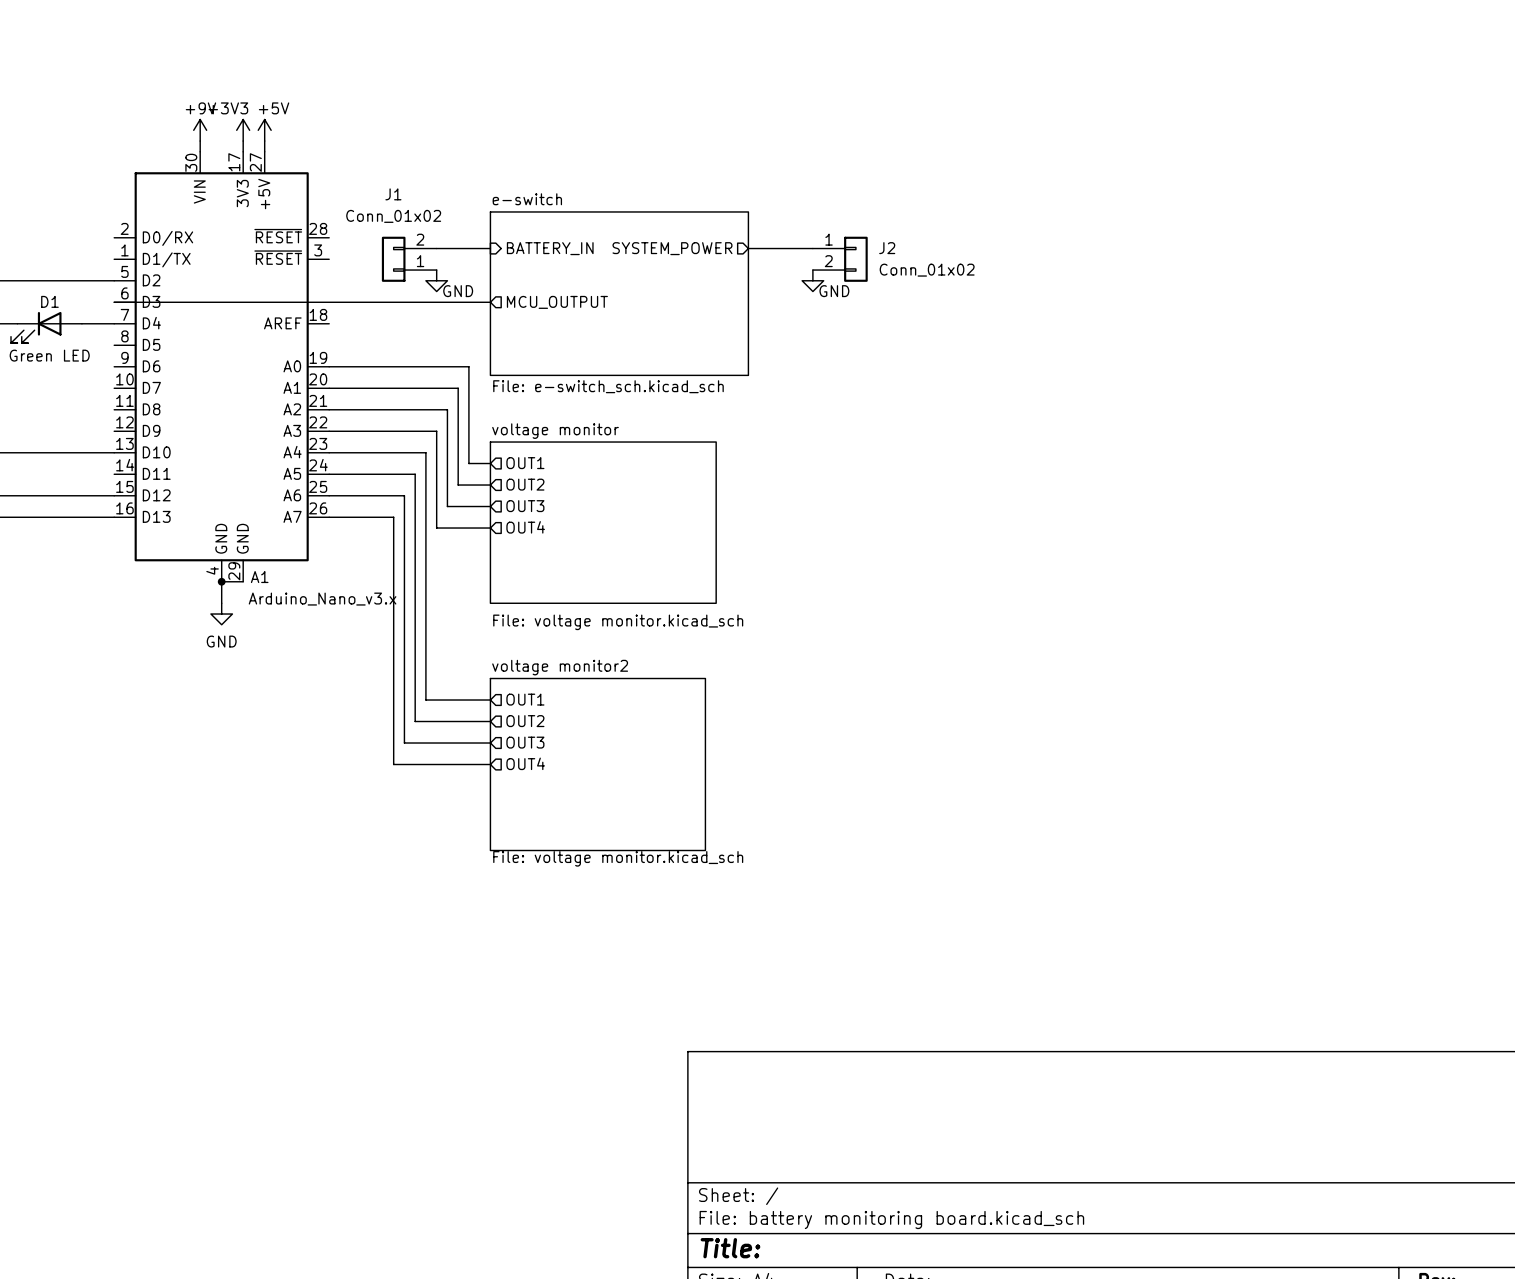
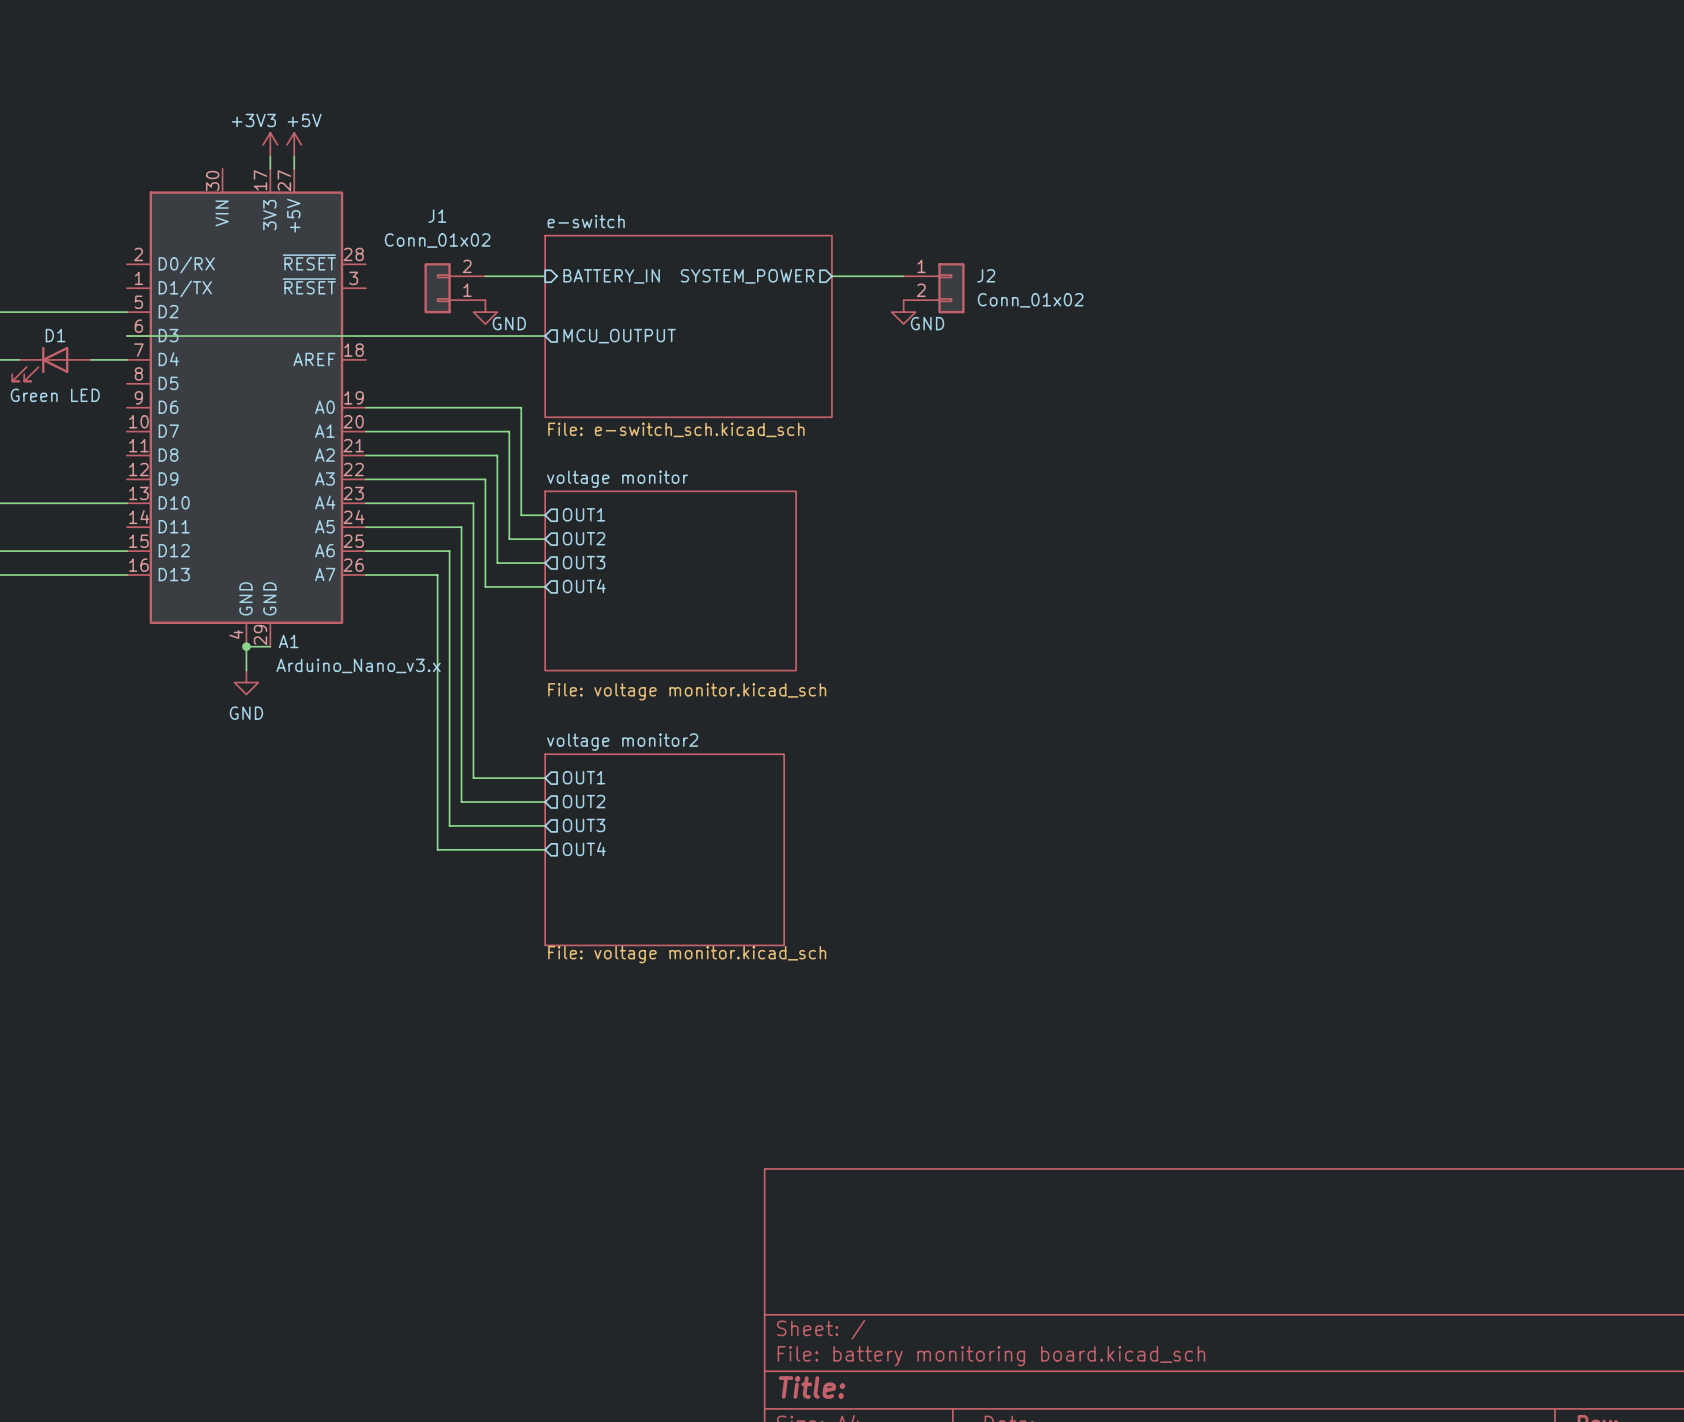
power symbol: +9V (200, 130) -> none
wire: (200, 141) (200, 151) -> none

